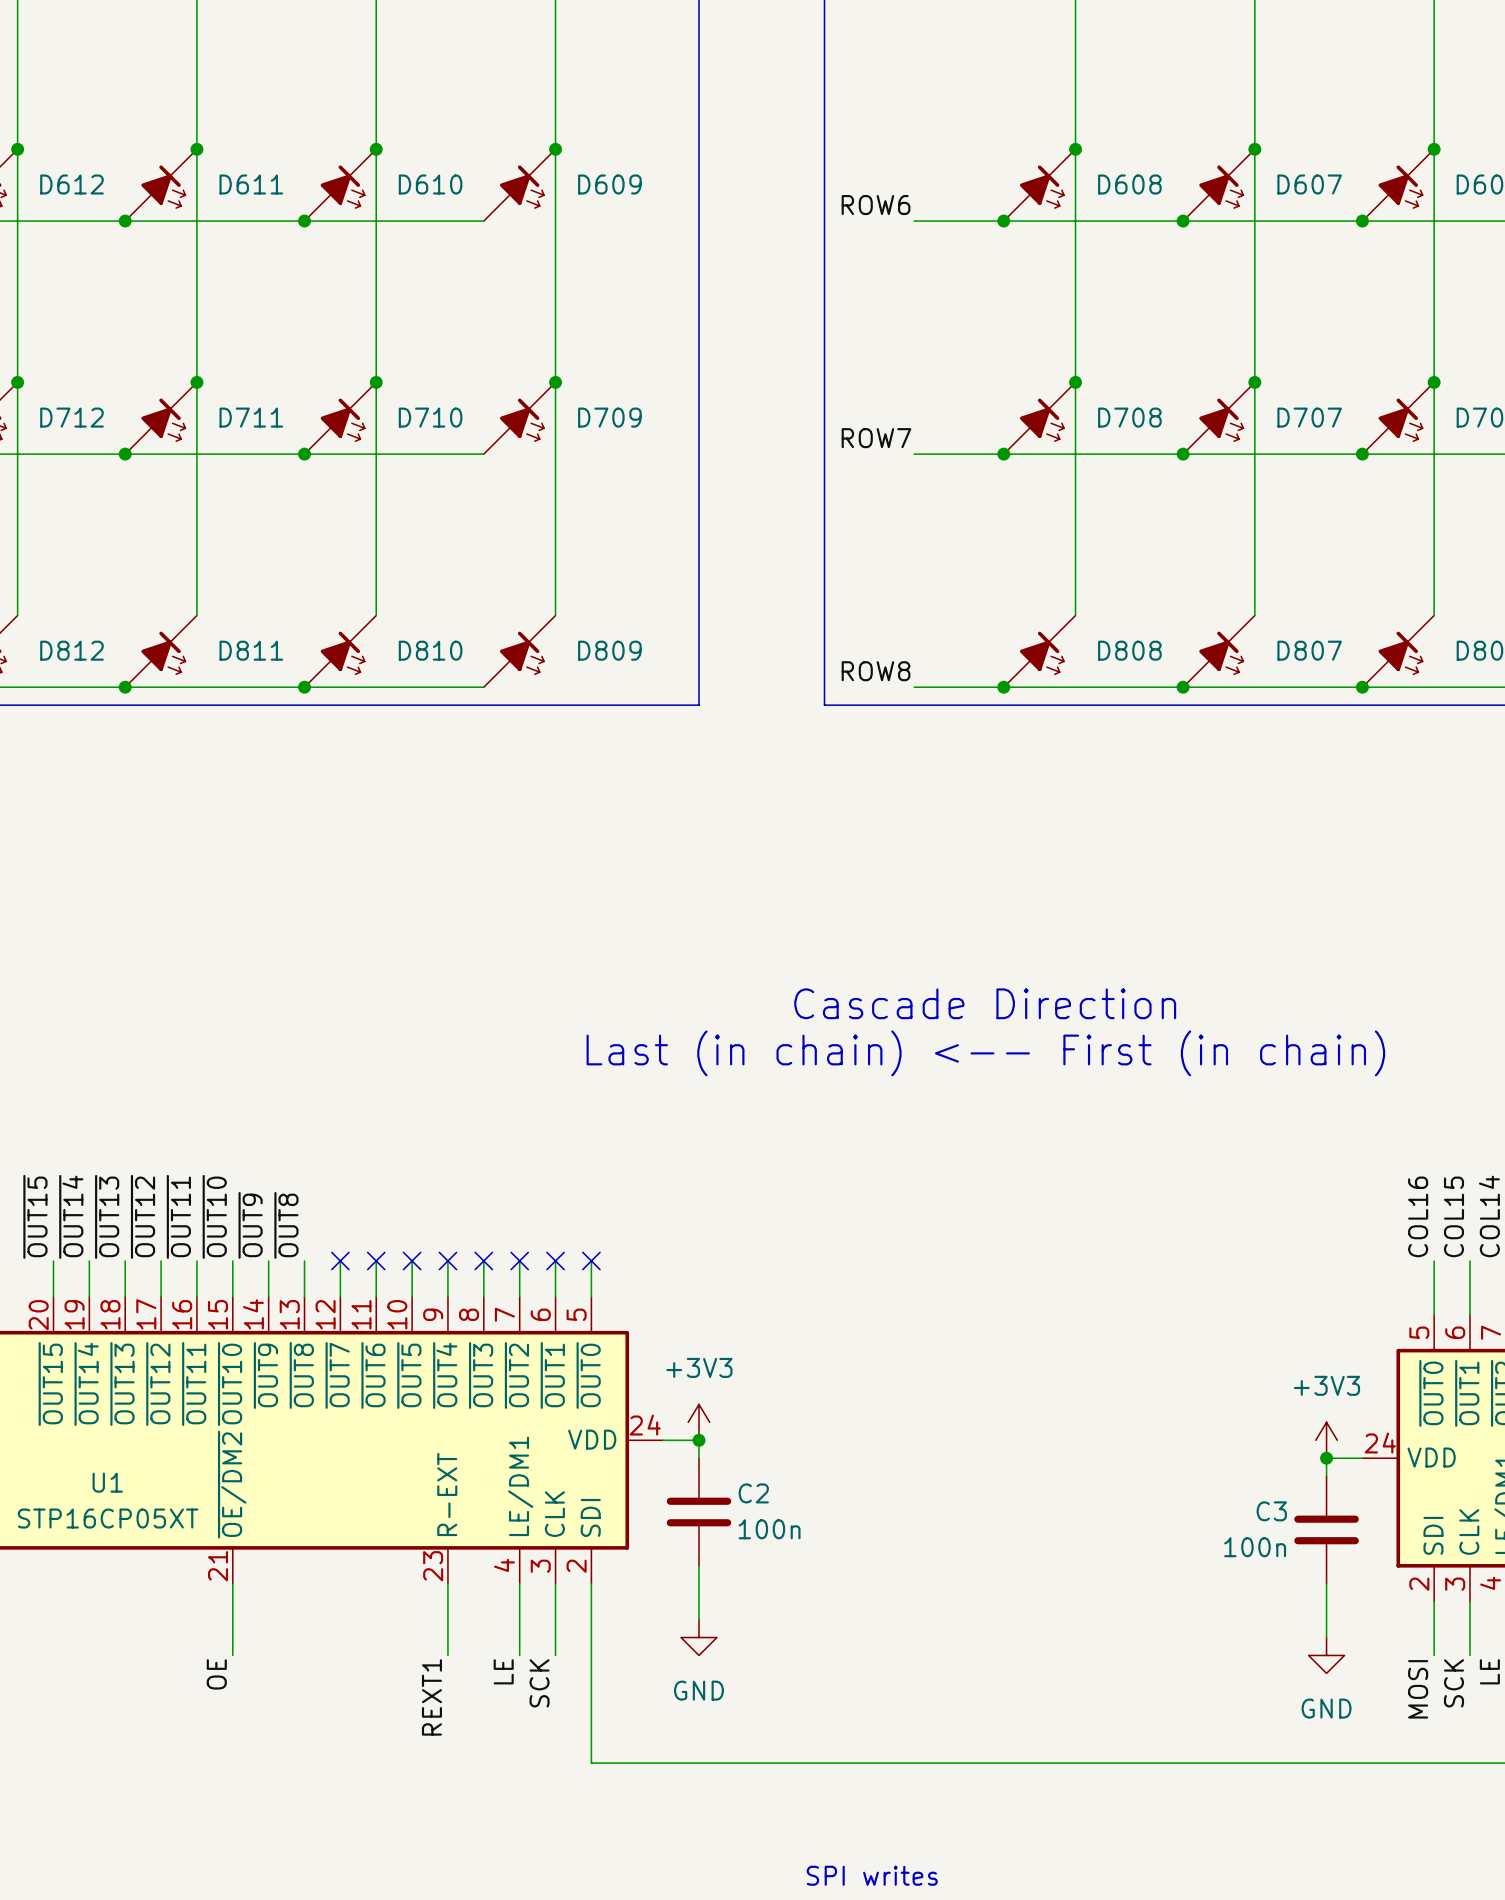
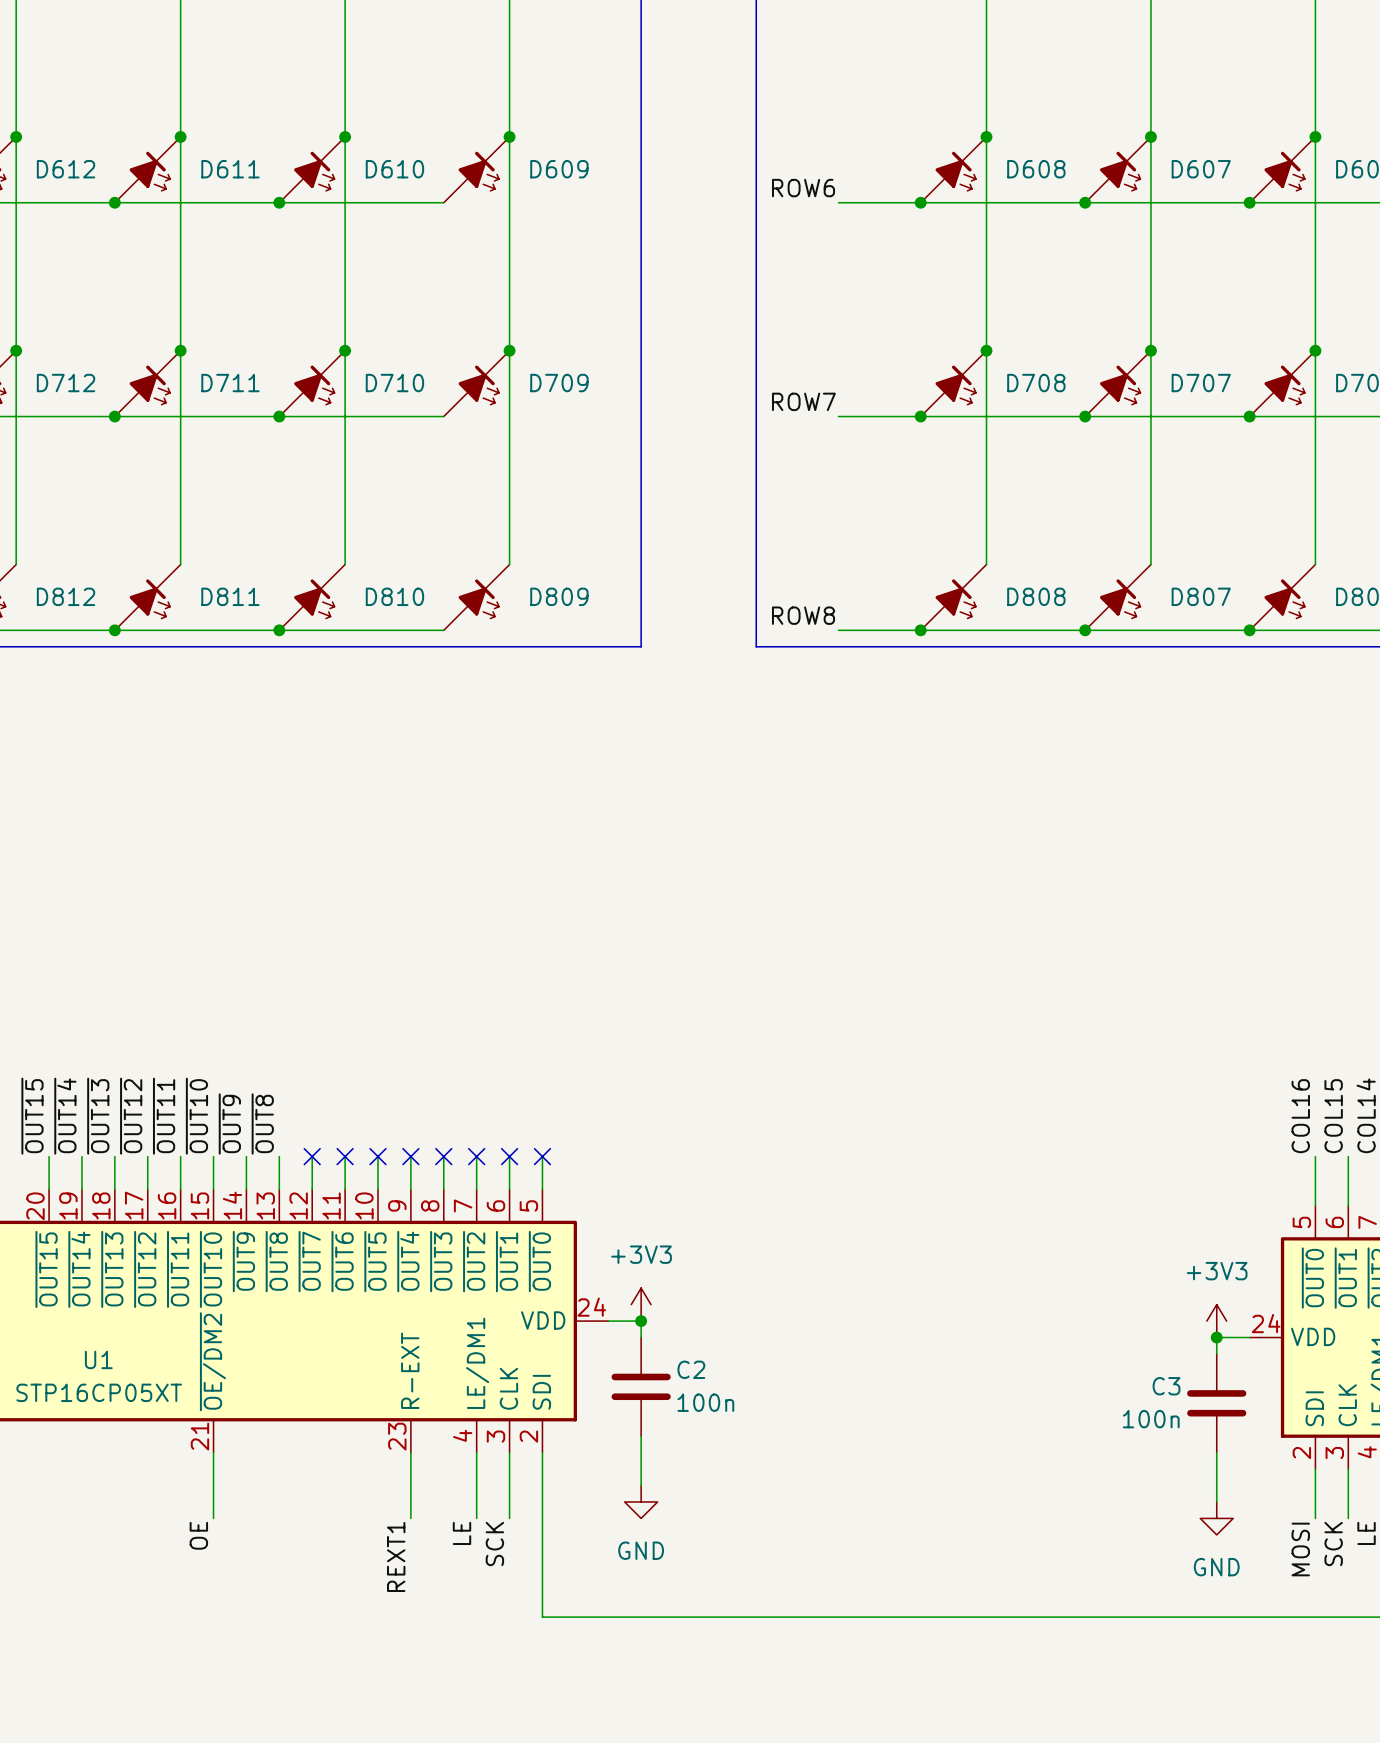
text: Cascade Direction (985, 1003) -> none
text: Last (in chain) <-- First (in chain) (985, 1053) -> none
text: SPI writes (872, 1875) -> none

